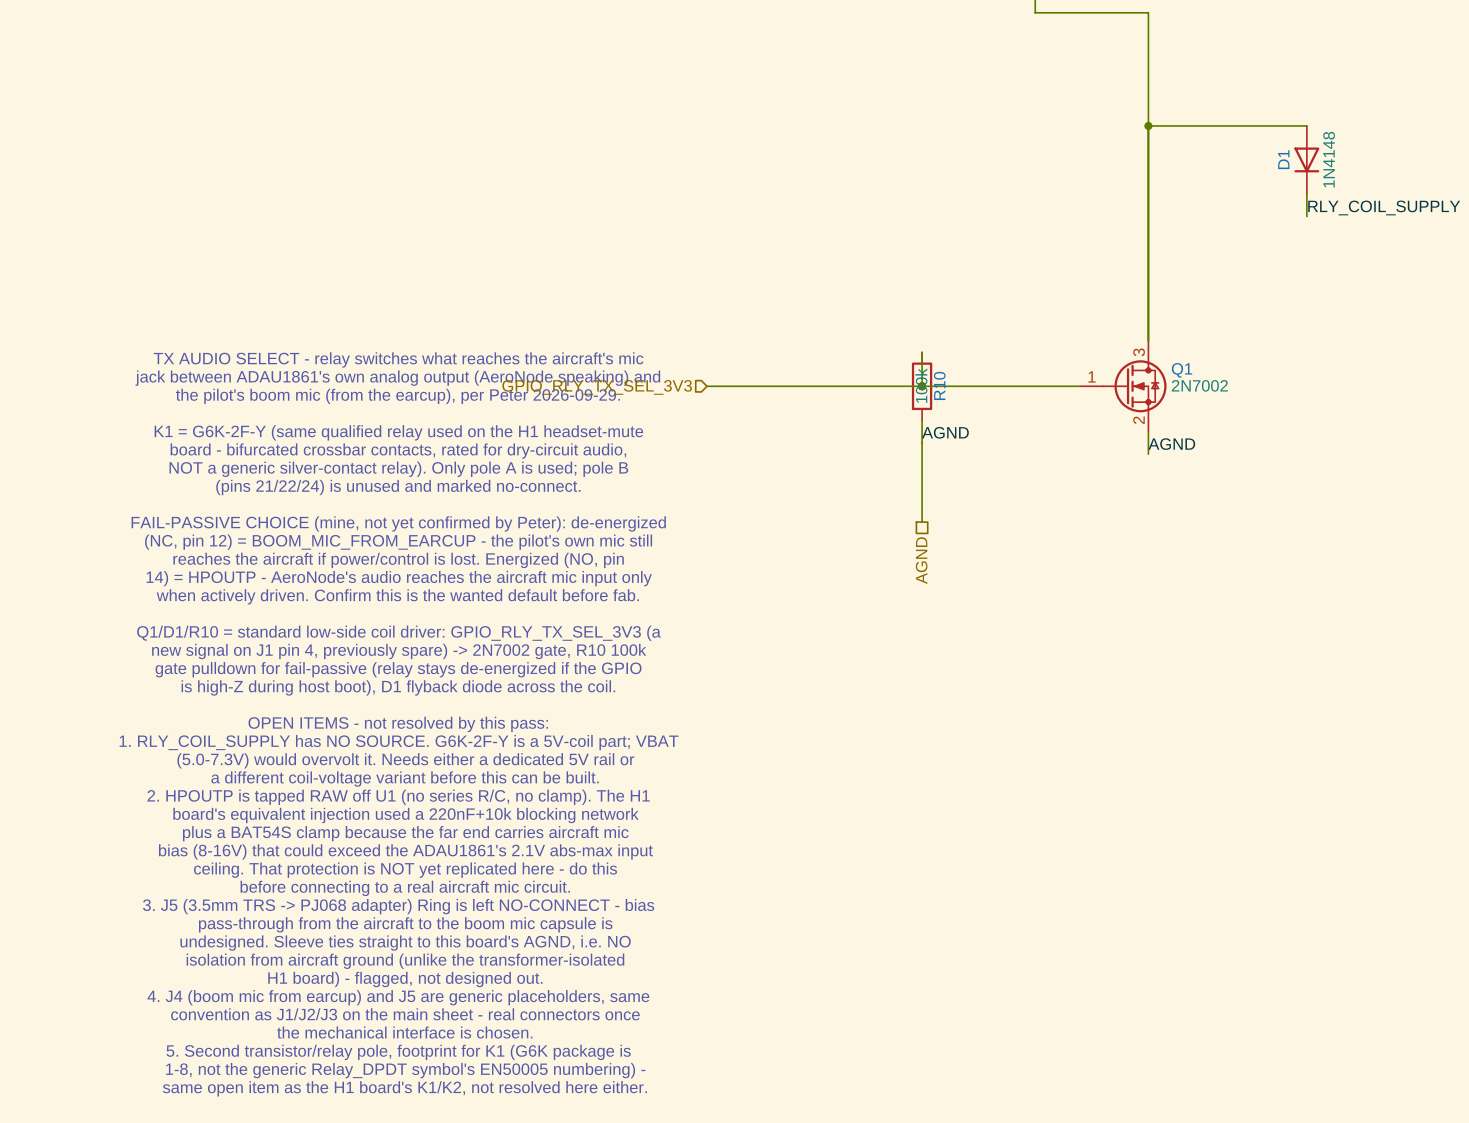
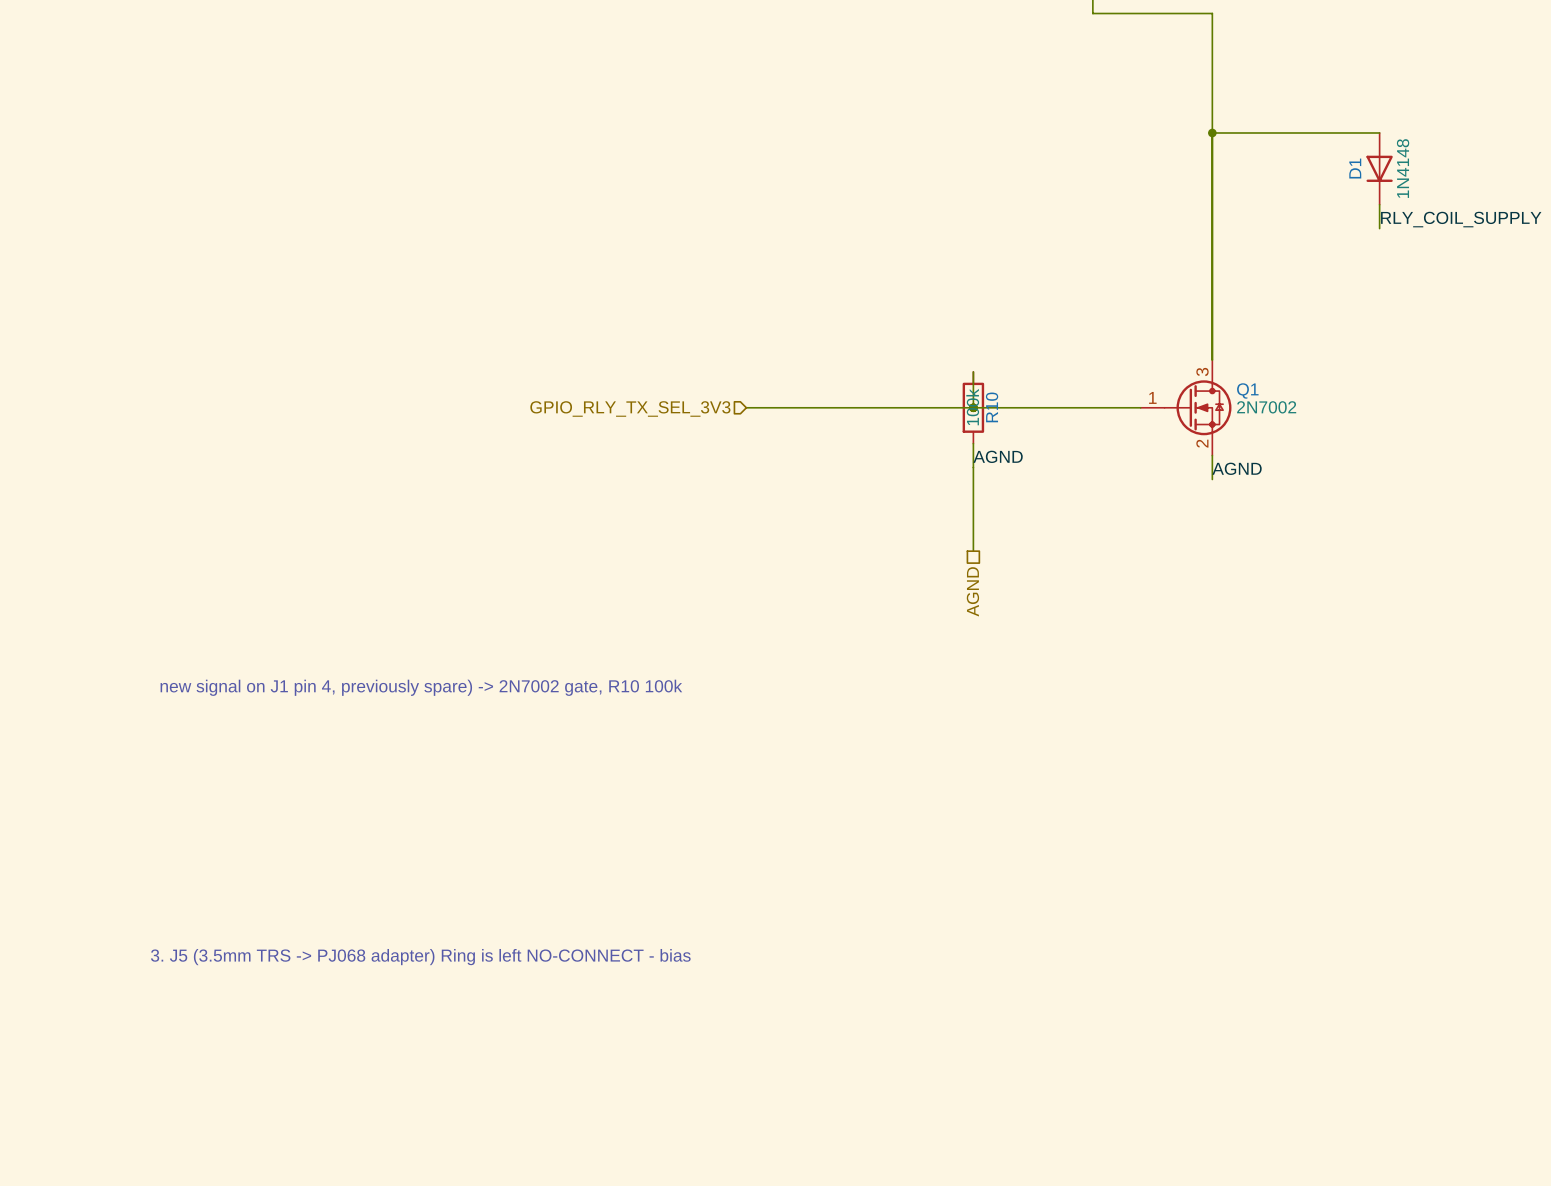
text: TX AUDIO SELECT - relay switches what reaches the aircraft's mic (398, 359) -> none
text: jack between ADAU1861's own analog output (AeroNode speaking) and (397, 378) -> none
text: the pilot's boom mic (from the earcup), per Peter 2026-09-29. (397, 396) -> none
text: K1 = G6K-2F-Y (same qualified relay used on the H1 headset-mute (398, 432) -> none
text: board - bifurcated crossbar contacts, rated for dry-circuit audio, (398, 451) -> none
text: NOT a generic silver-contact relay). Only pole A is used; pole B (398, 469) -> none
text: (pins 21/22/24) is unused and marked no-connect. (398, 487) -> none
text: FAIL-PASSIVE CHOICE (mine, not yet confirmed by Peter): de-energized (398, 523) -> none
text: (NC, pin 12) = BOOM_MIC_FROM_EARCUP - the pilot's own mic still (398, 542) -> none
text: reaches the aircraft if power/control is lost. Energized (NO, pin (398, 560) -> none
text: 14) = HPOUTP - AeroNode's audio reaches the aircraft mic input only (399, 578) -> none
text: when actively driven. Confirm this is the wanted default before fab. (397, 596) -> none
text: Q1/D1/R10 = standard low-side coil driver: GPIO_RLY_TX_SEL_3V3 (a (398, 633) -> none
text: gate pulldown for fail-passive (relay stays de-energized if the GPIO (398, 669) -> none
text: is high-Z during host boot), D1 flyback diode across the coil. (398, 687) -> none
text: OPEN ITEMS - not resolved by this pass: (398, 724) -> none
text: 1. RLY_COIL_SUPPLY has NO SOURCE. G6K-2F-Y is a 5V-coil part; VBAT (399, 742) -> none
text: (5.0-7.3V) would overvolt it. Needs either a dedicated 5V rail or (405, 760) -> none
text: a different coil-voltage variant before this can be built. (405, 779) -> none
text: 2. HPOUTP is tapped RAW off U1 (no series R/C, no clamp). The H1 (398, 797) -> none
text: board's equivalent injection used a 220nF+10k blocking network (405, 815) -> none
text: plus a BAT54S clamp because the far end carries aircraft mic (405, 833) -> none
text: bias (8-16V) that could exceed the ADAU1861's 2.1V abs-max input (405, 851) -> none
text: ceiling. That protection is NOT yet replicated here - do this (405, 870) -> none
text: before connecting to a real aircraft mic circuit. (405, 888) -> none
text: pass-through from the aircraft to the boom mic capsule is (405, 924) -> none
text: undesigned. Sleeve ties straight to this board's AGND, i.e. NO (405, 943) -> none
text: isolation from aircraft ground (unlike the transformer-isolated (405, 961) -> none
text: H1 board) - flagged, not designed out. (405, 979) -> none
text: 4. J4 (boom mic from earcup) and J5 are generic placeholders, same (398, 997) -> none
text: convention as J1/J2/J3 on the main sheet - real connectors once (405, 1014) -> none
text: the mechanical interface is chosen. (404, 1032) -> none
text: 5. Second transistor/relay pole, footprint for K1 (G6K package is (398, 1052) -> none
text: 1-8, not the generic Relay_DPDT symbol's EN50005 numbering) - (405, 1070) -> none
text: same open item as the H1 board's K1/K2, not resolved here either. (404, 1088) -> none

